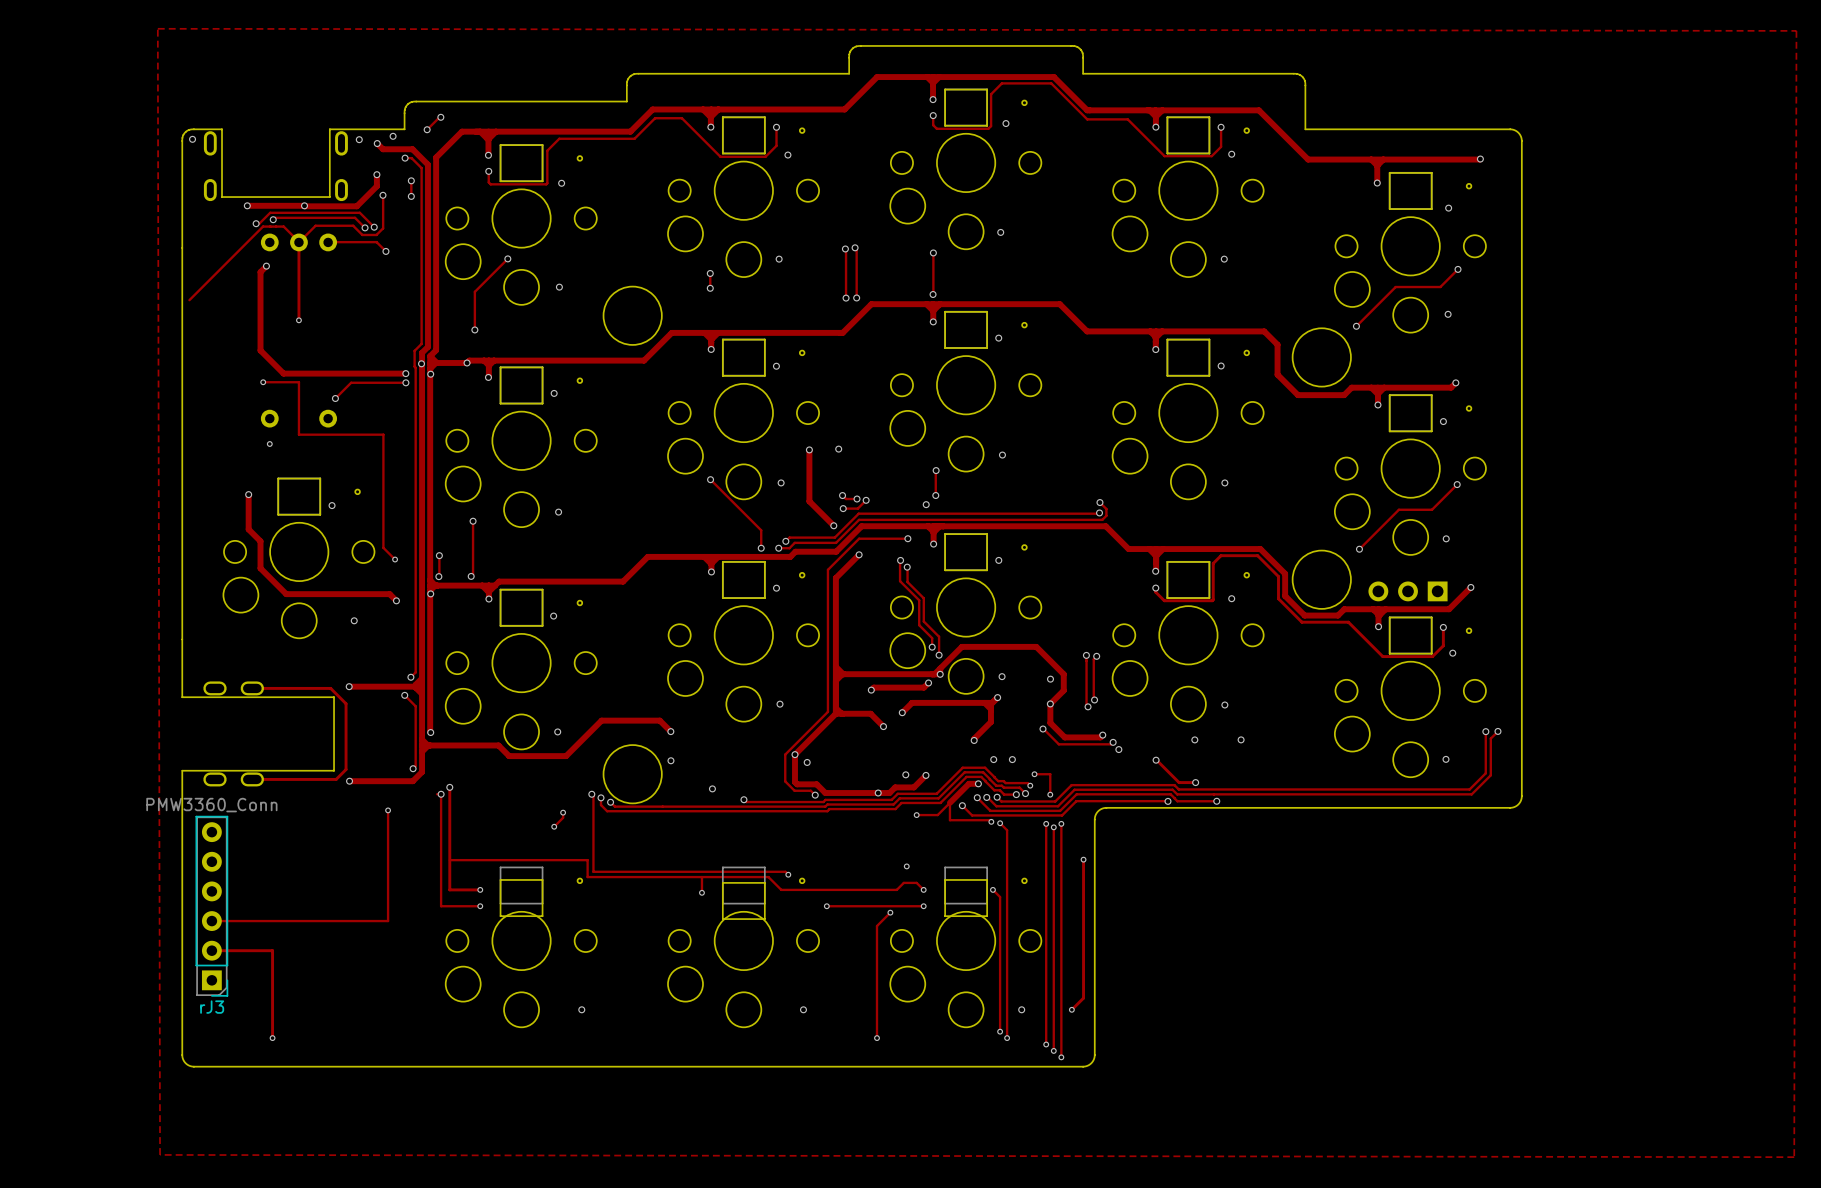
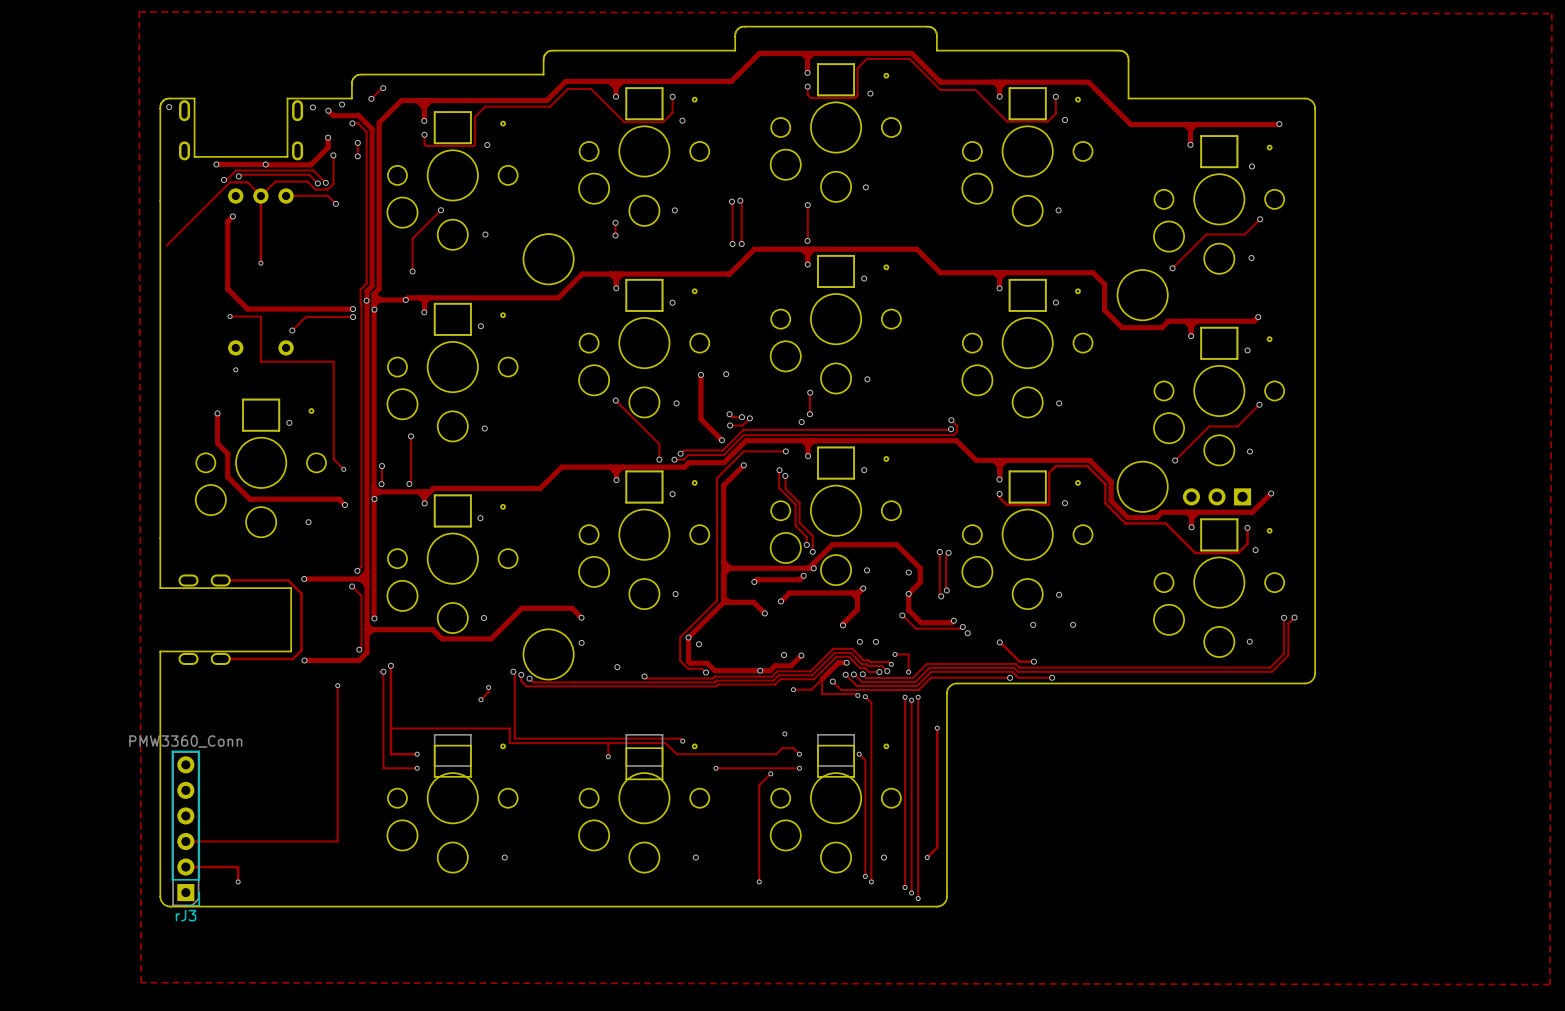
rJ3 position: (211, 906) -> (185, 828)
track: (211, 921) (388, 921) -> (185, 841) (337, 841) (337, 781)
track: (211, 950) (272, 950) (272, 1020) -> (185, 867) (238, 867)

